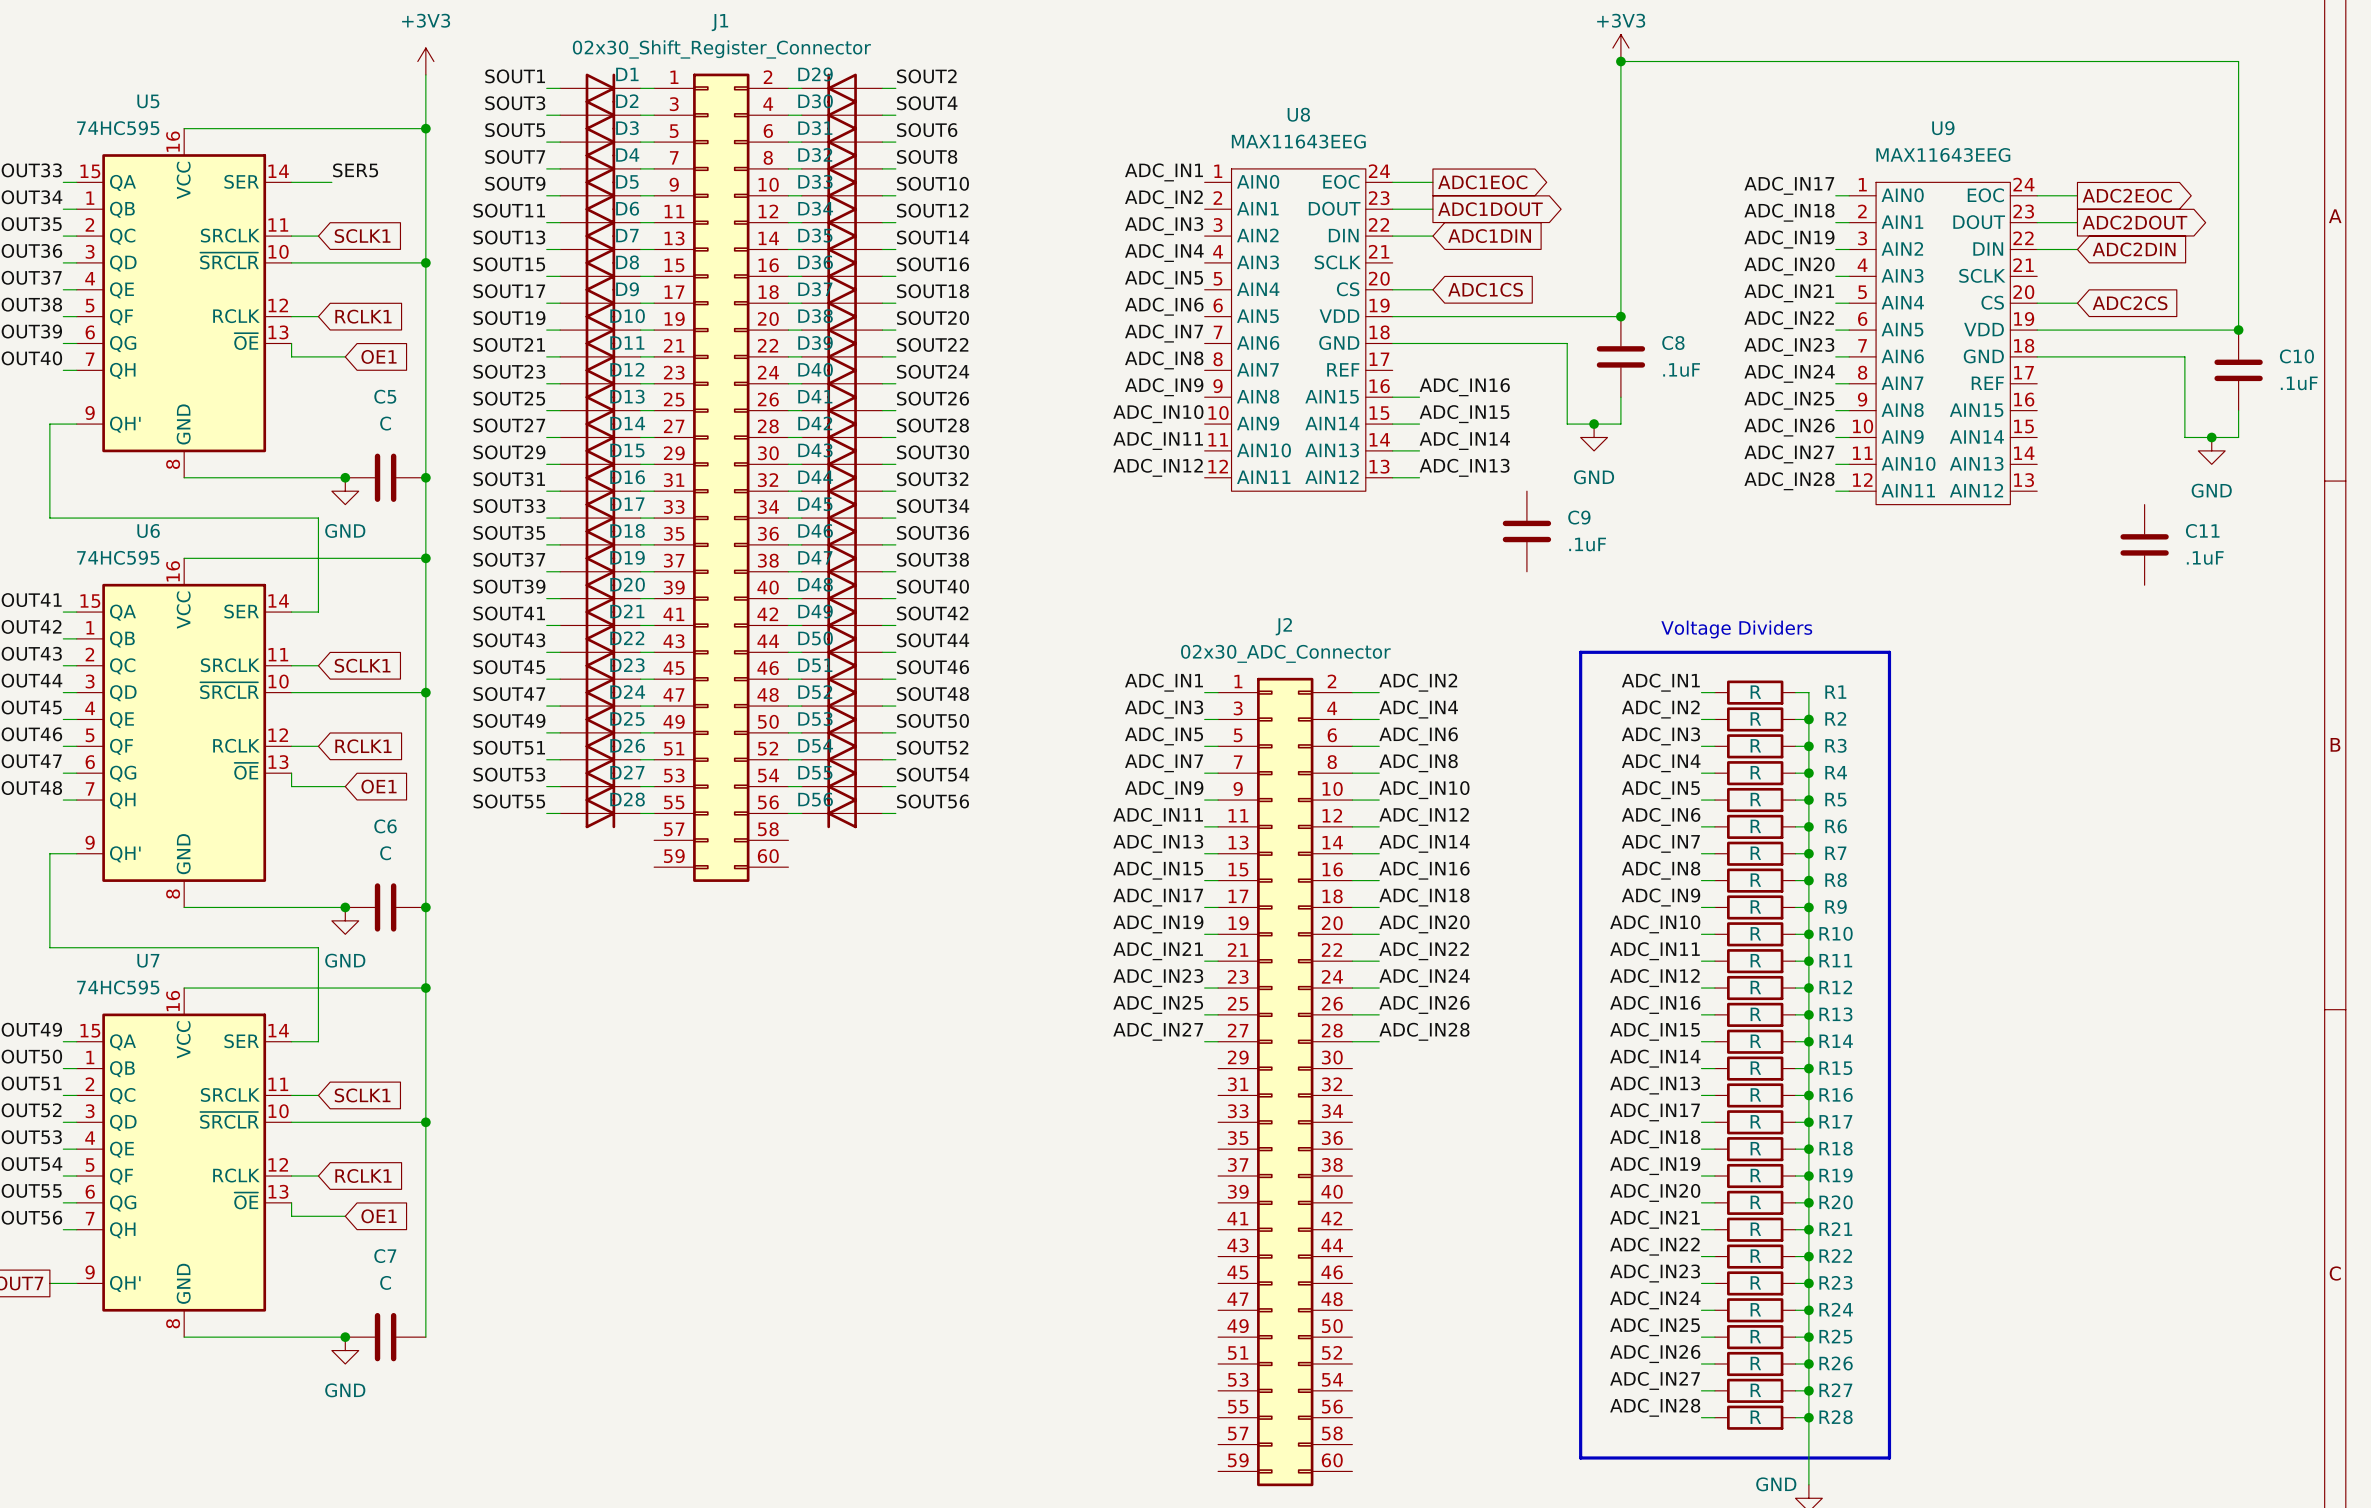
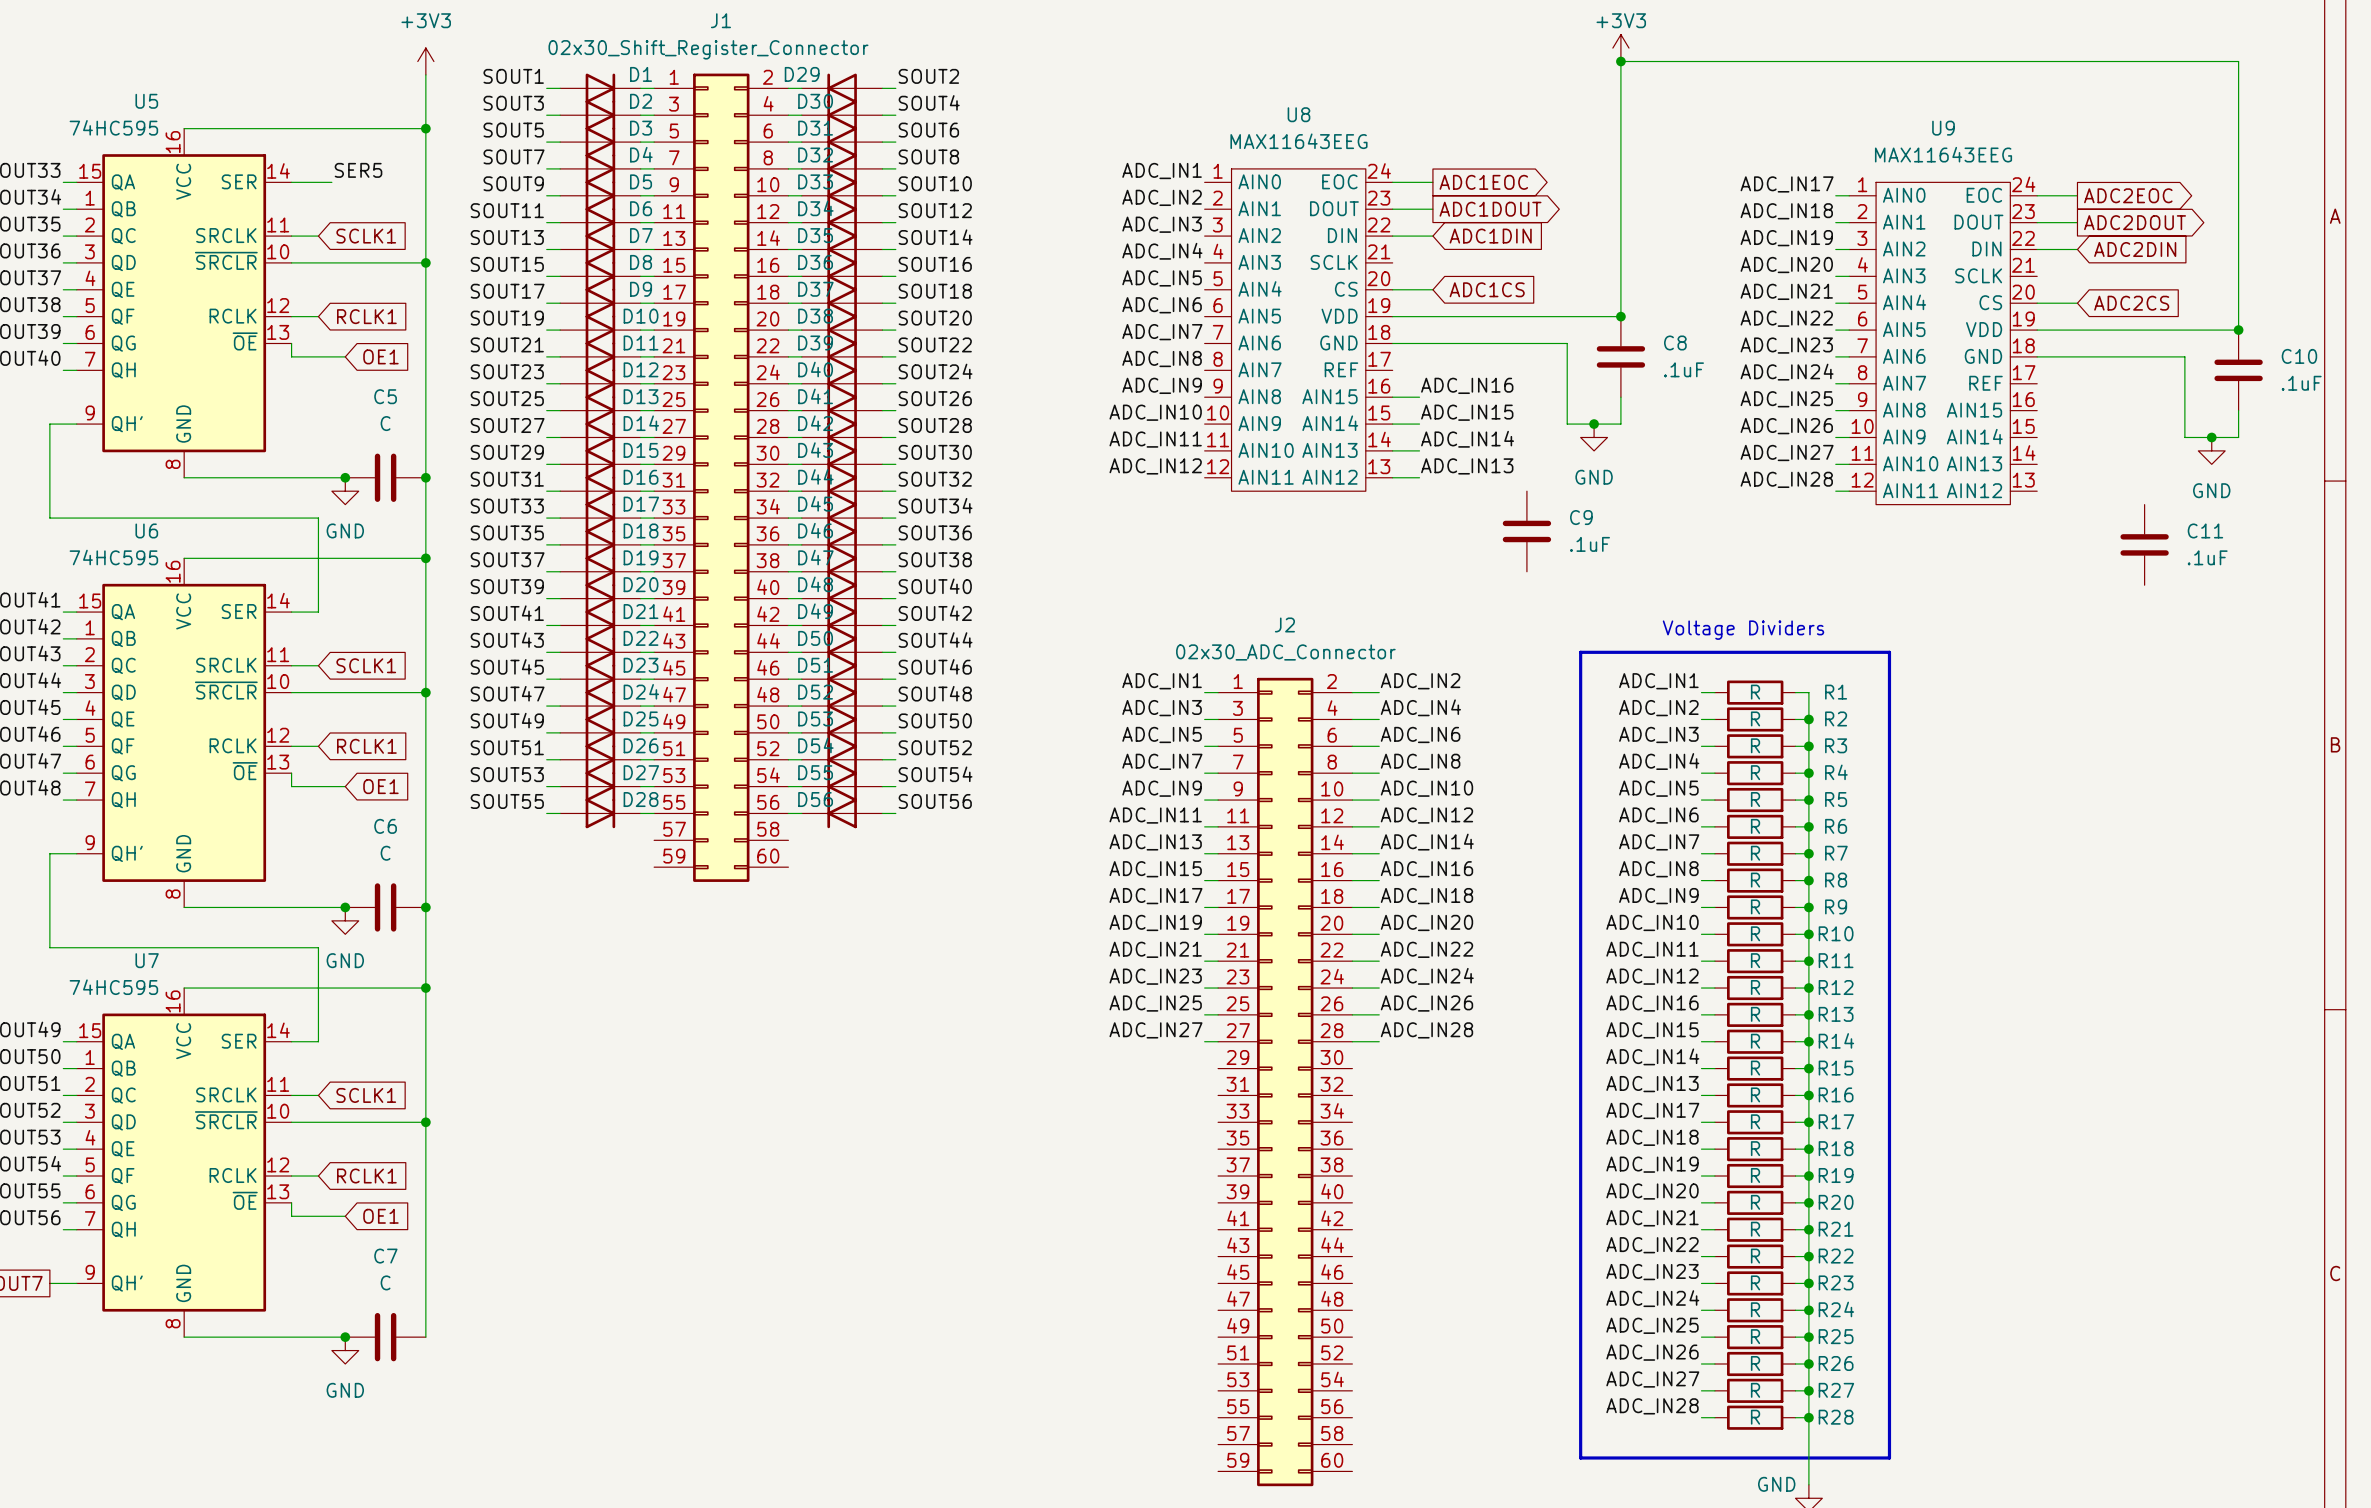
J1 value position: 02x30_Shift_Register_Connector (721, 49) -> 02x30_Shift_Register_Connector (708, 49)
D1 name position: D1 (627, 74) -> D1 (641, 74)
D29 name position: D29 (815, 74) -> D29 (802, 74)
D2 name position: D2 (627, 101) -> D2 (641, 101)
D3 name position: D3 (627, 128) -> D3 (641, 128)
D4 name position: D4 (627, 155) -> D4 (641, 154)
D5 name position: D5 (627, 181) -> D5 (641, 181)
D6 name position: D6 (627, 208) -> D6 (641, 208)
D7 name position: D7 (627, 235) -> D7 (641, 235)
D8 name position: D8 (627, 262) -> D8 (641, 262)
D9 name position: D9 (627, 289) -> D9 (641, 289)
D10 name position: D10 (627, 316) -> D10 (641, 316)
D11 name position: D11 (627, 342) -> D11 (641, 342)
D12 name position: D12 (627, 369) -> D12 (641, 369)
D13 name position: D13 (627, 396) -> D13 (641, 396)
D14 name position: D14 (627, 423) -> D14 (641, 423)
D15 name position: D15 (627, 450) -> D15 (641, 450)
D16 name position: D16 (627, 477) -> D16 (641, 477)
D17 name position: D17 (627, 504) -> D17 (641, 504)
D18 name position: D18 (627, 530) -> D18 (641, 530)
D19 name position: D19 (627, 557) -> D19 (641, 557)
D20 name position: D20 (627, 584) -> D20 (641, 584)
D21 name position: D21 (627, 611) -> D21 (641, 611)
D22 name position: D22 (627, 638) -> D22 (641, 638)
D23 name position: D23 (627, 665) -> D23 (641, 665)
D24 name position: D24 (627, 691) -> D24 (641, 691)
D25 name position: D25 (627, 718) -> D25 (641, 718)
D26 name position: D26 (627, 745) -> D26 (641, 745)
D27 name position: D27 (627, 772) -> D27 (641, 772)
D28 name position: D28 (627, 799) -> D28 (641, 799)

